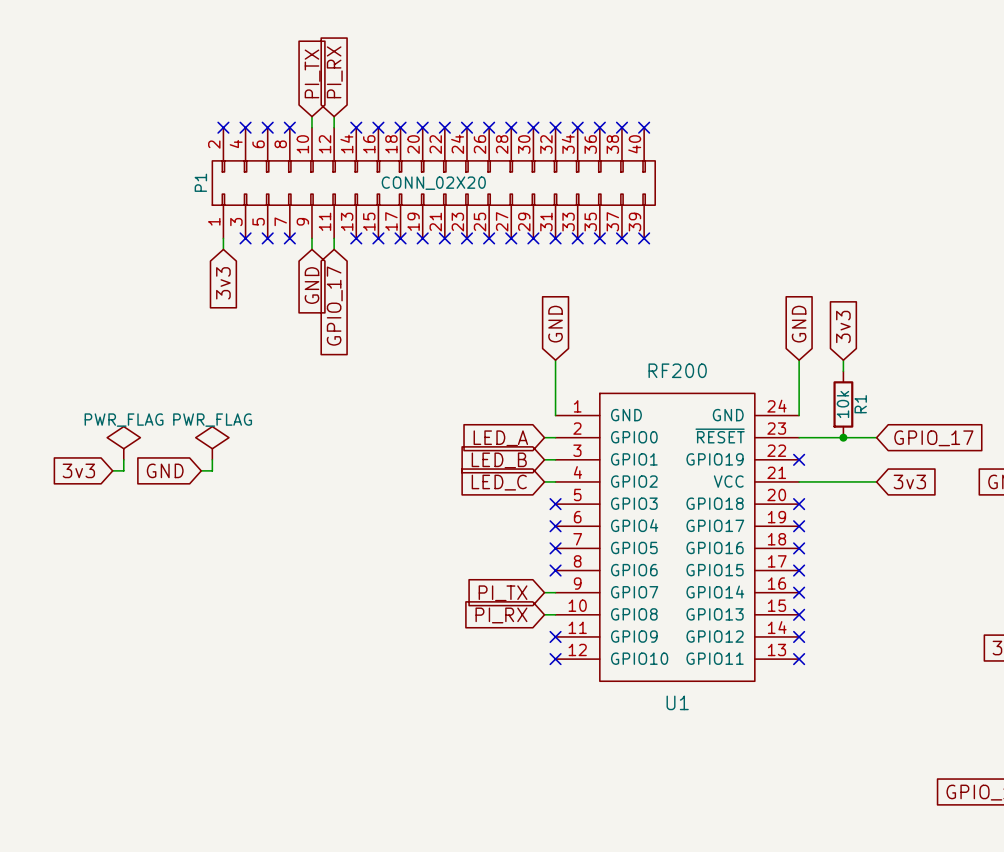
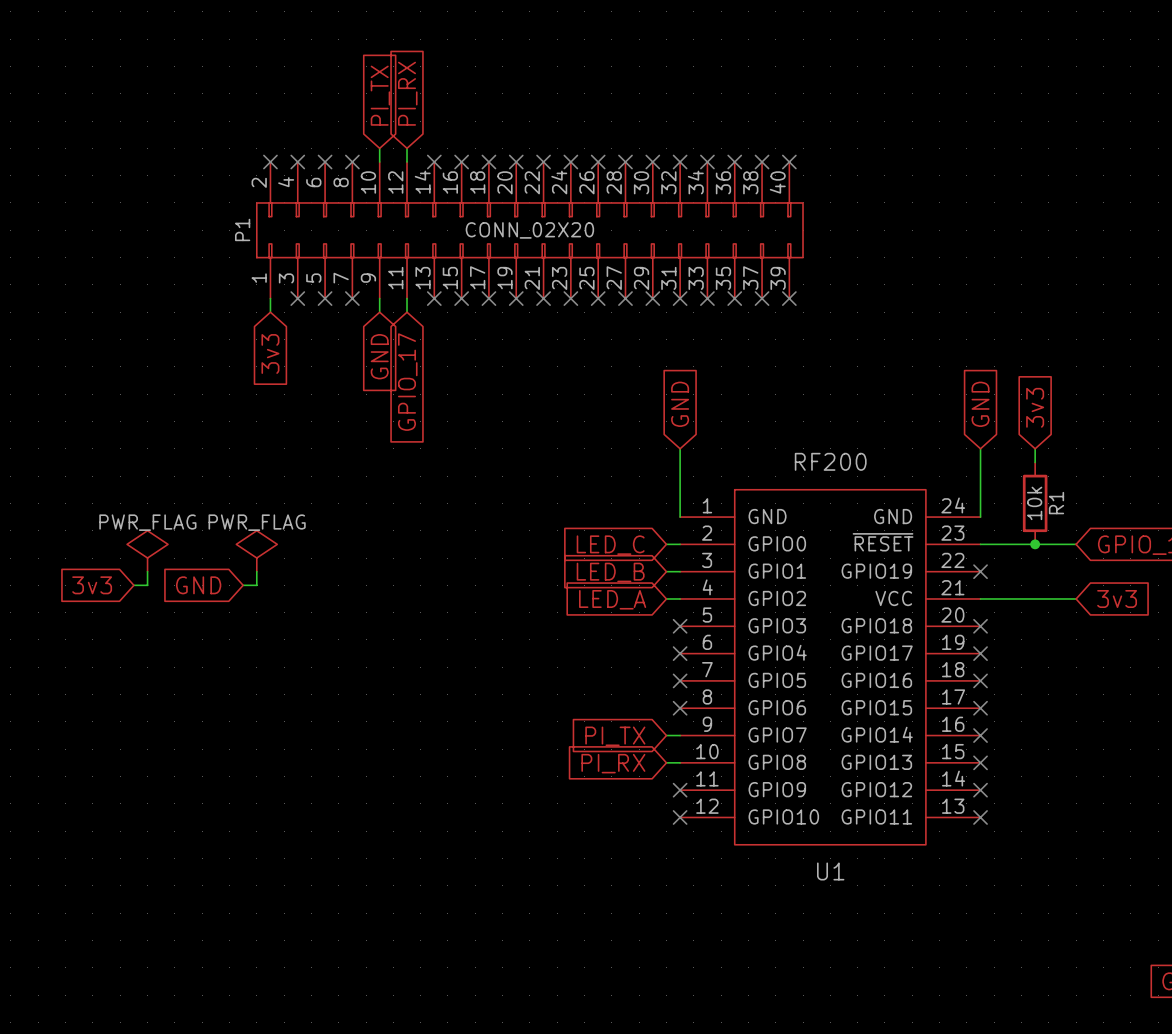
global label: LED_A (500, 438) -> LED_C (610, 545)
global label: LED_C (499, 482) -> LED_A (612, 599)

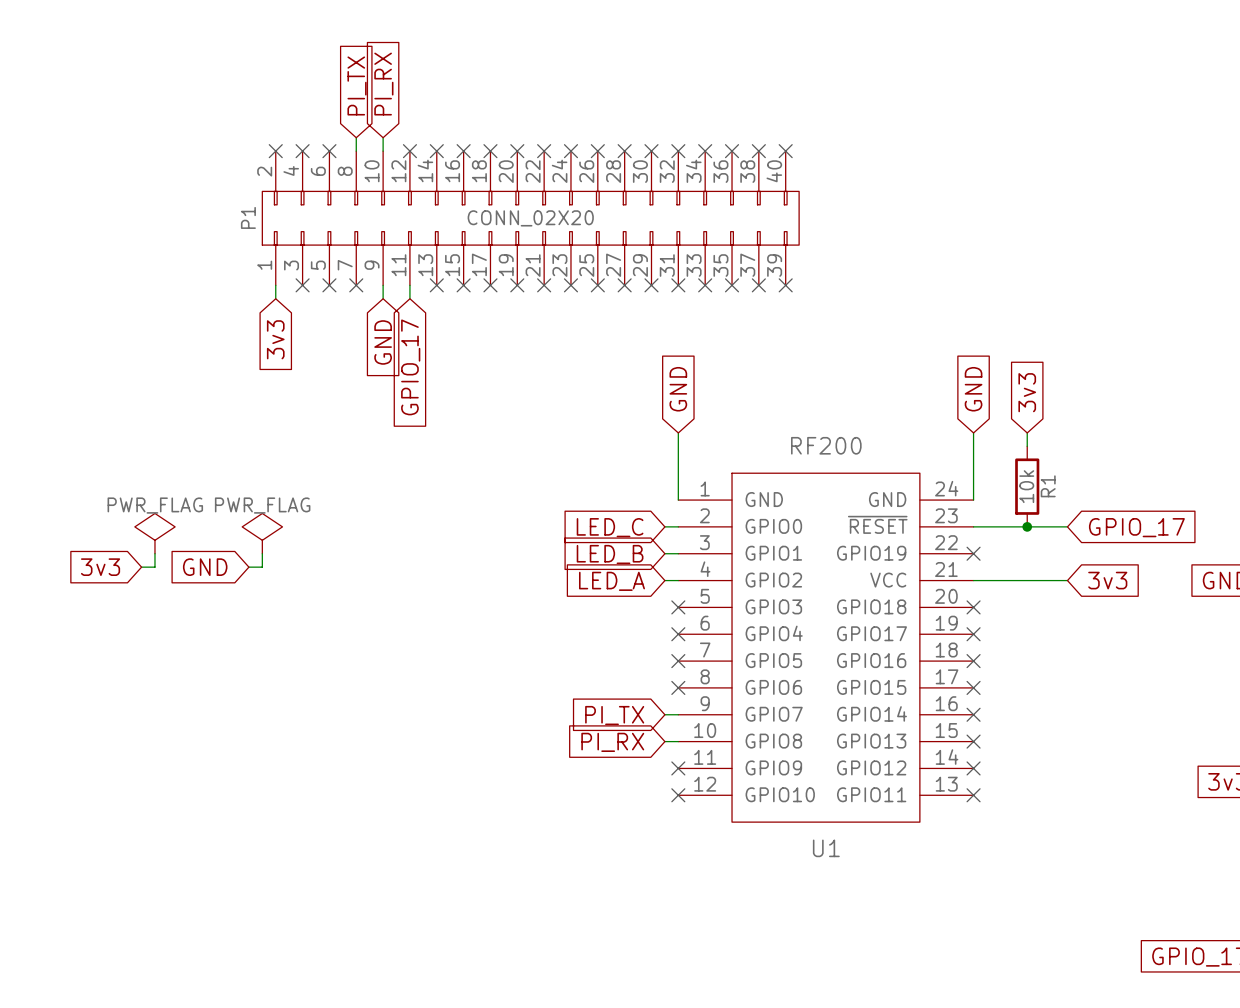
global label: PI_RX (407, 93) -> none
global label: none -> PI_TX (357, 85)
global label: PI_TX (380, 95) -> PI_RX (383, 84)
wire: (407, 148) (407, 162) -> (356, 137) (356, 151)
no-connect mark position: (352, 162) -> (409, 151)

